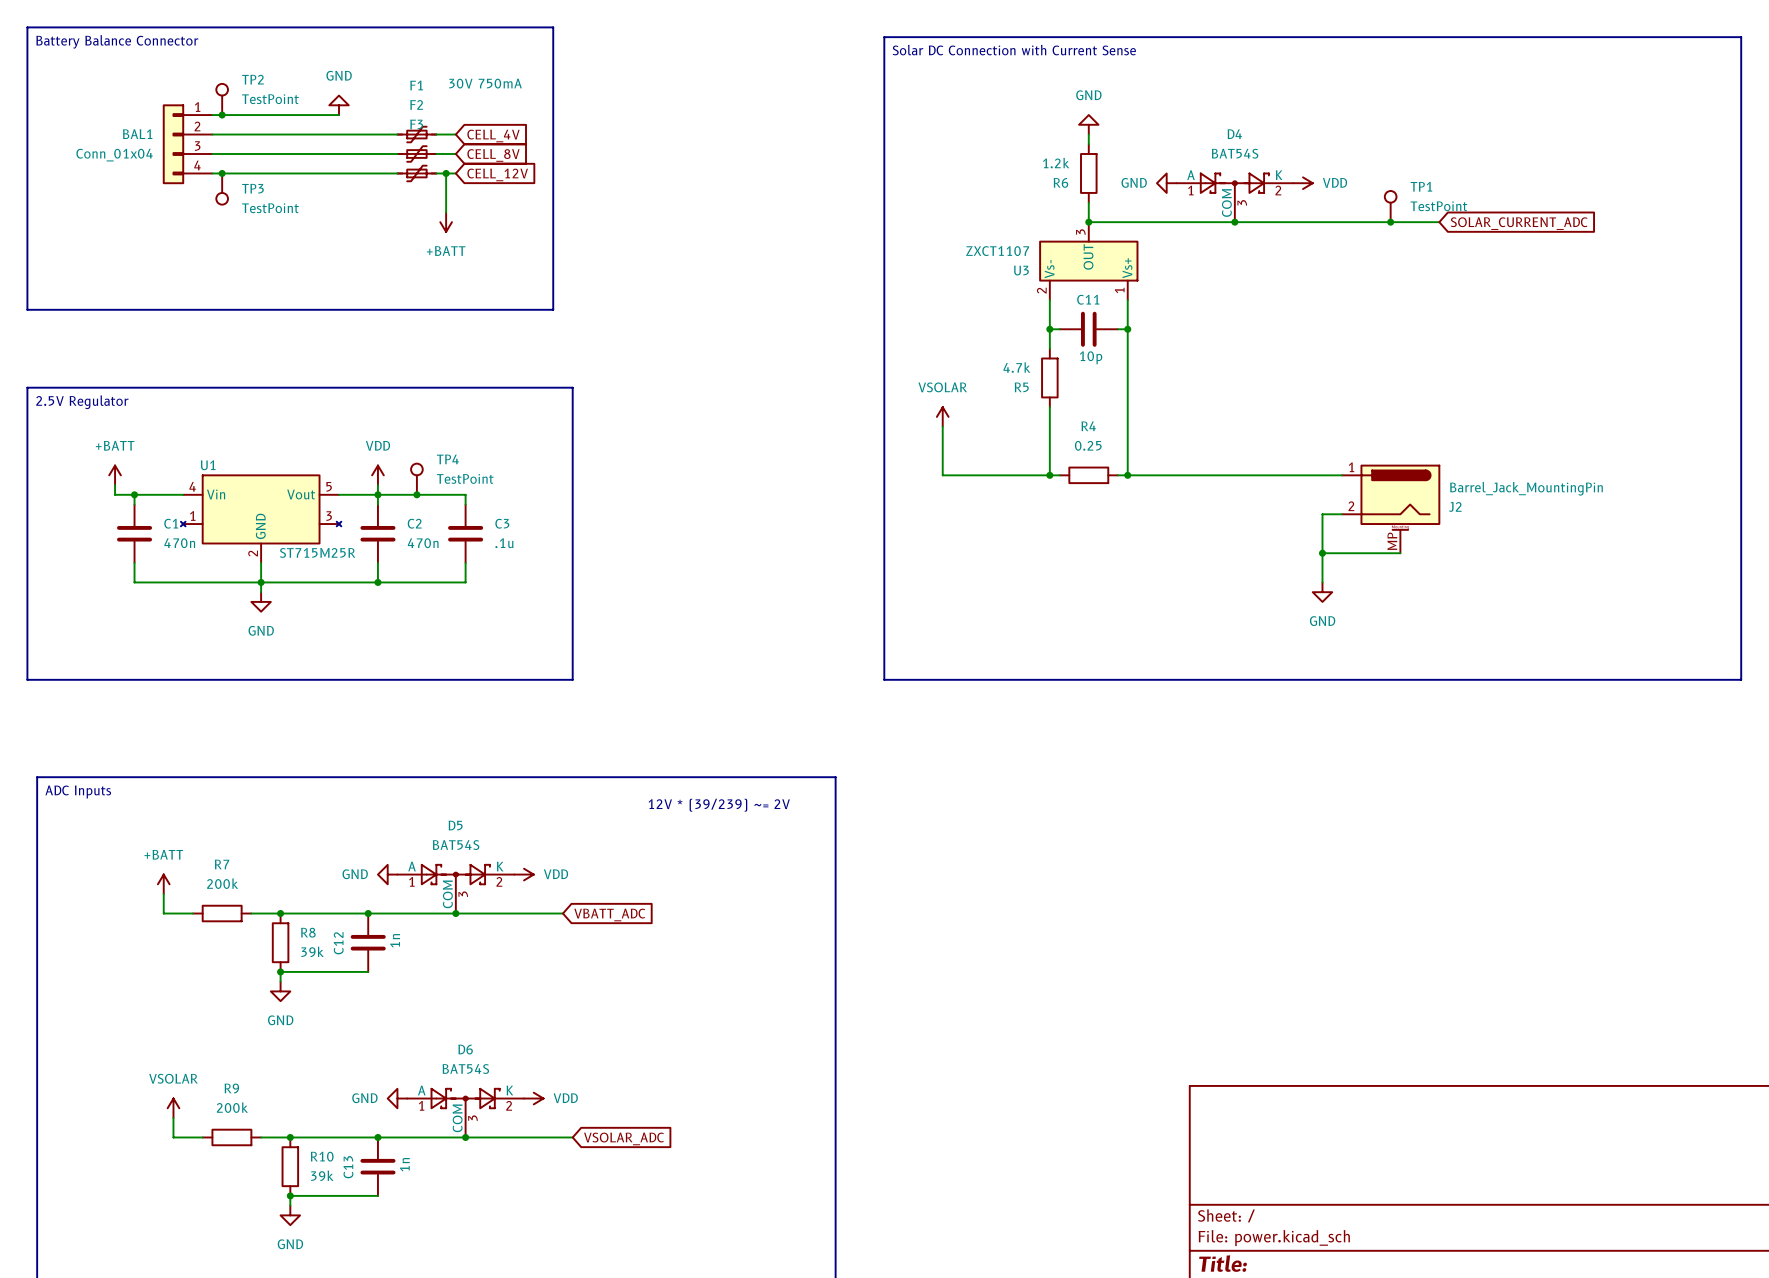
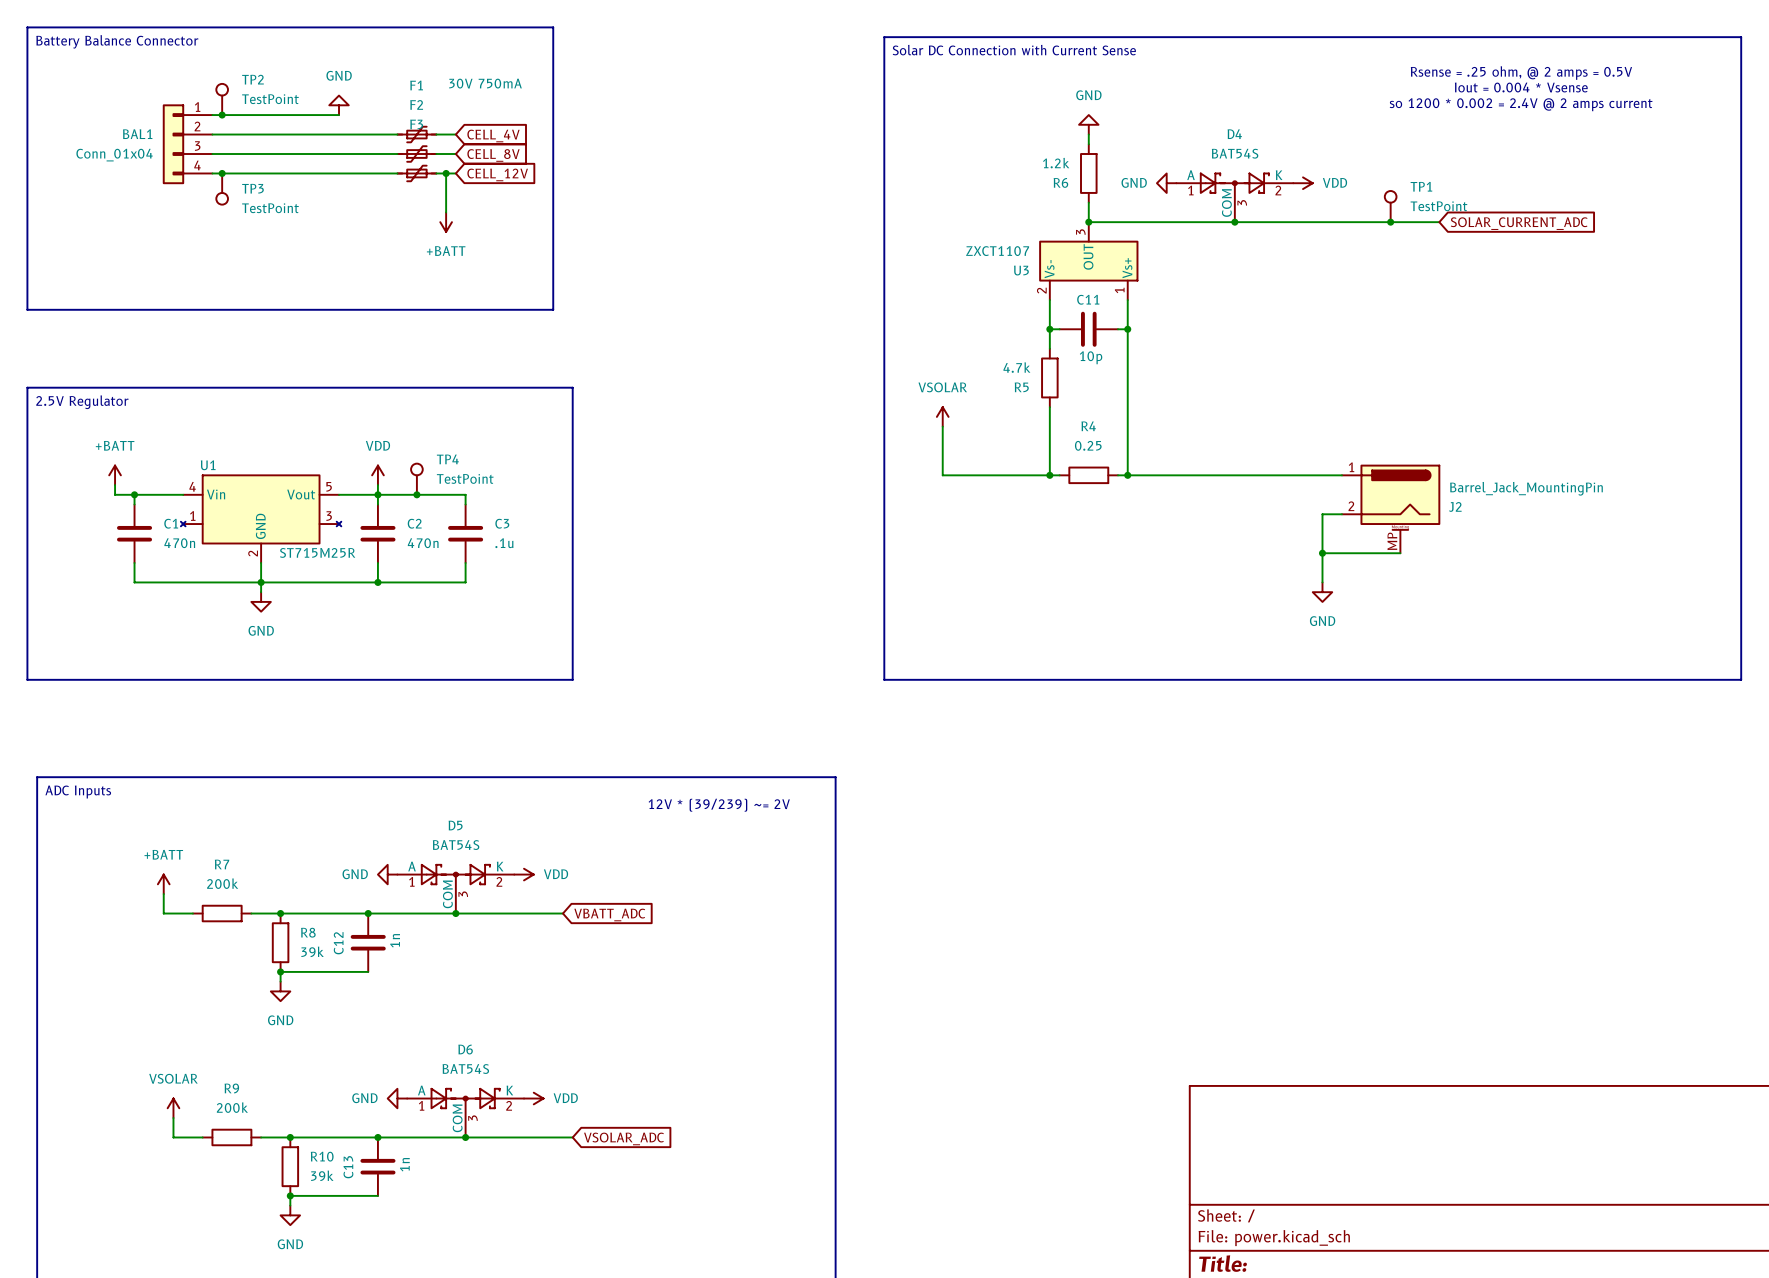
text: none -> Rsense = .25 ohm, @ 2 amps = 0.5V (1521, 73)
text: none -> Iout = 0.004 * Vsense (1521, 87)
text: none -> so 1200 * 0.002 = 2.4V @ 2 amps current (1521, 104)

